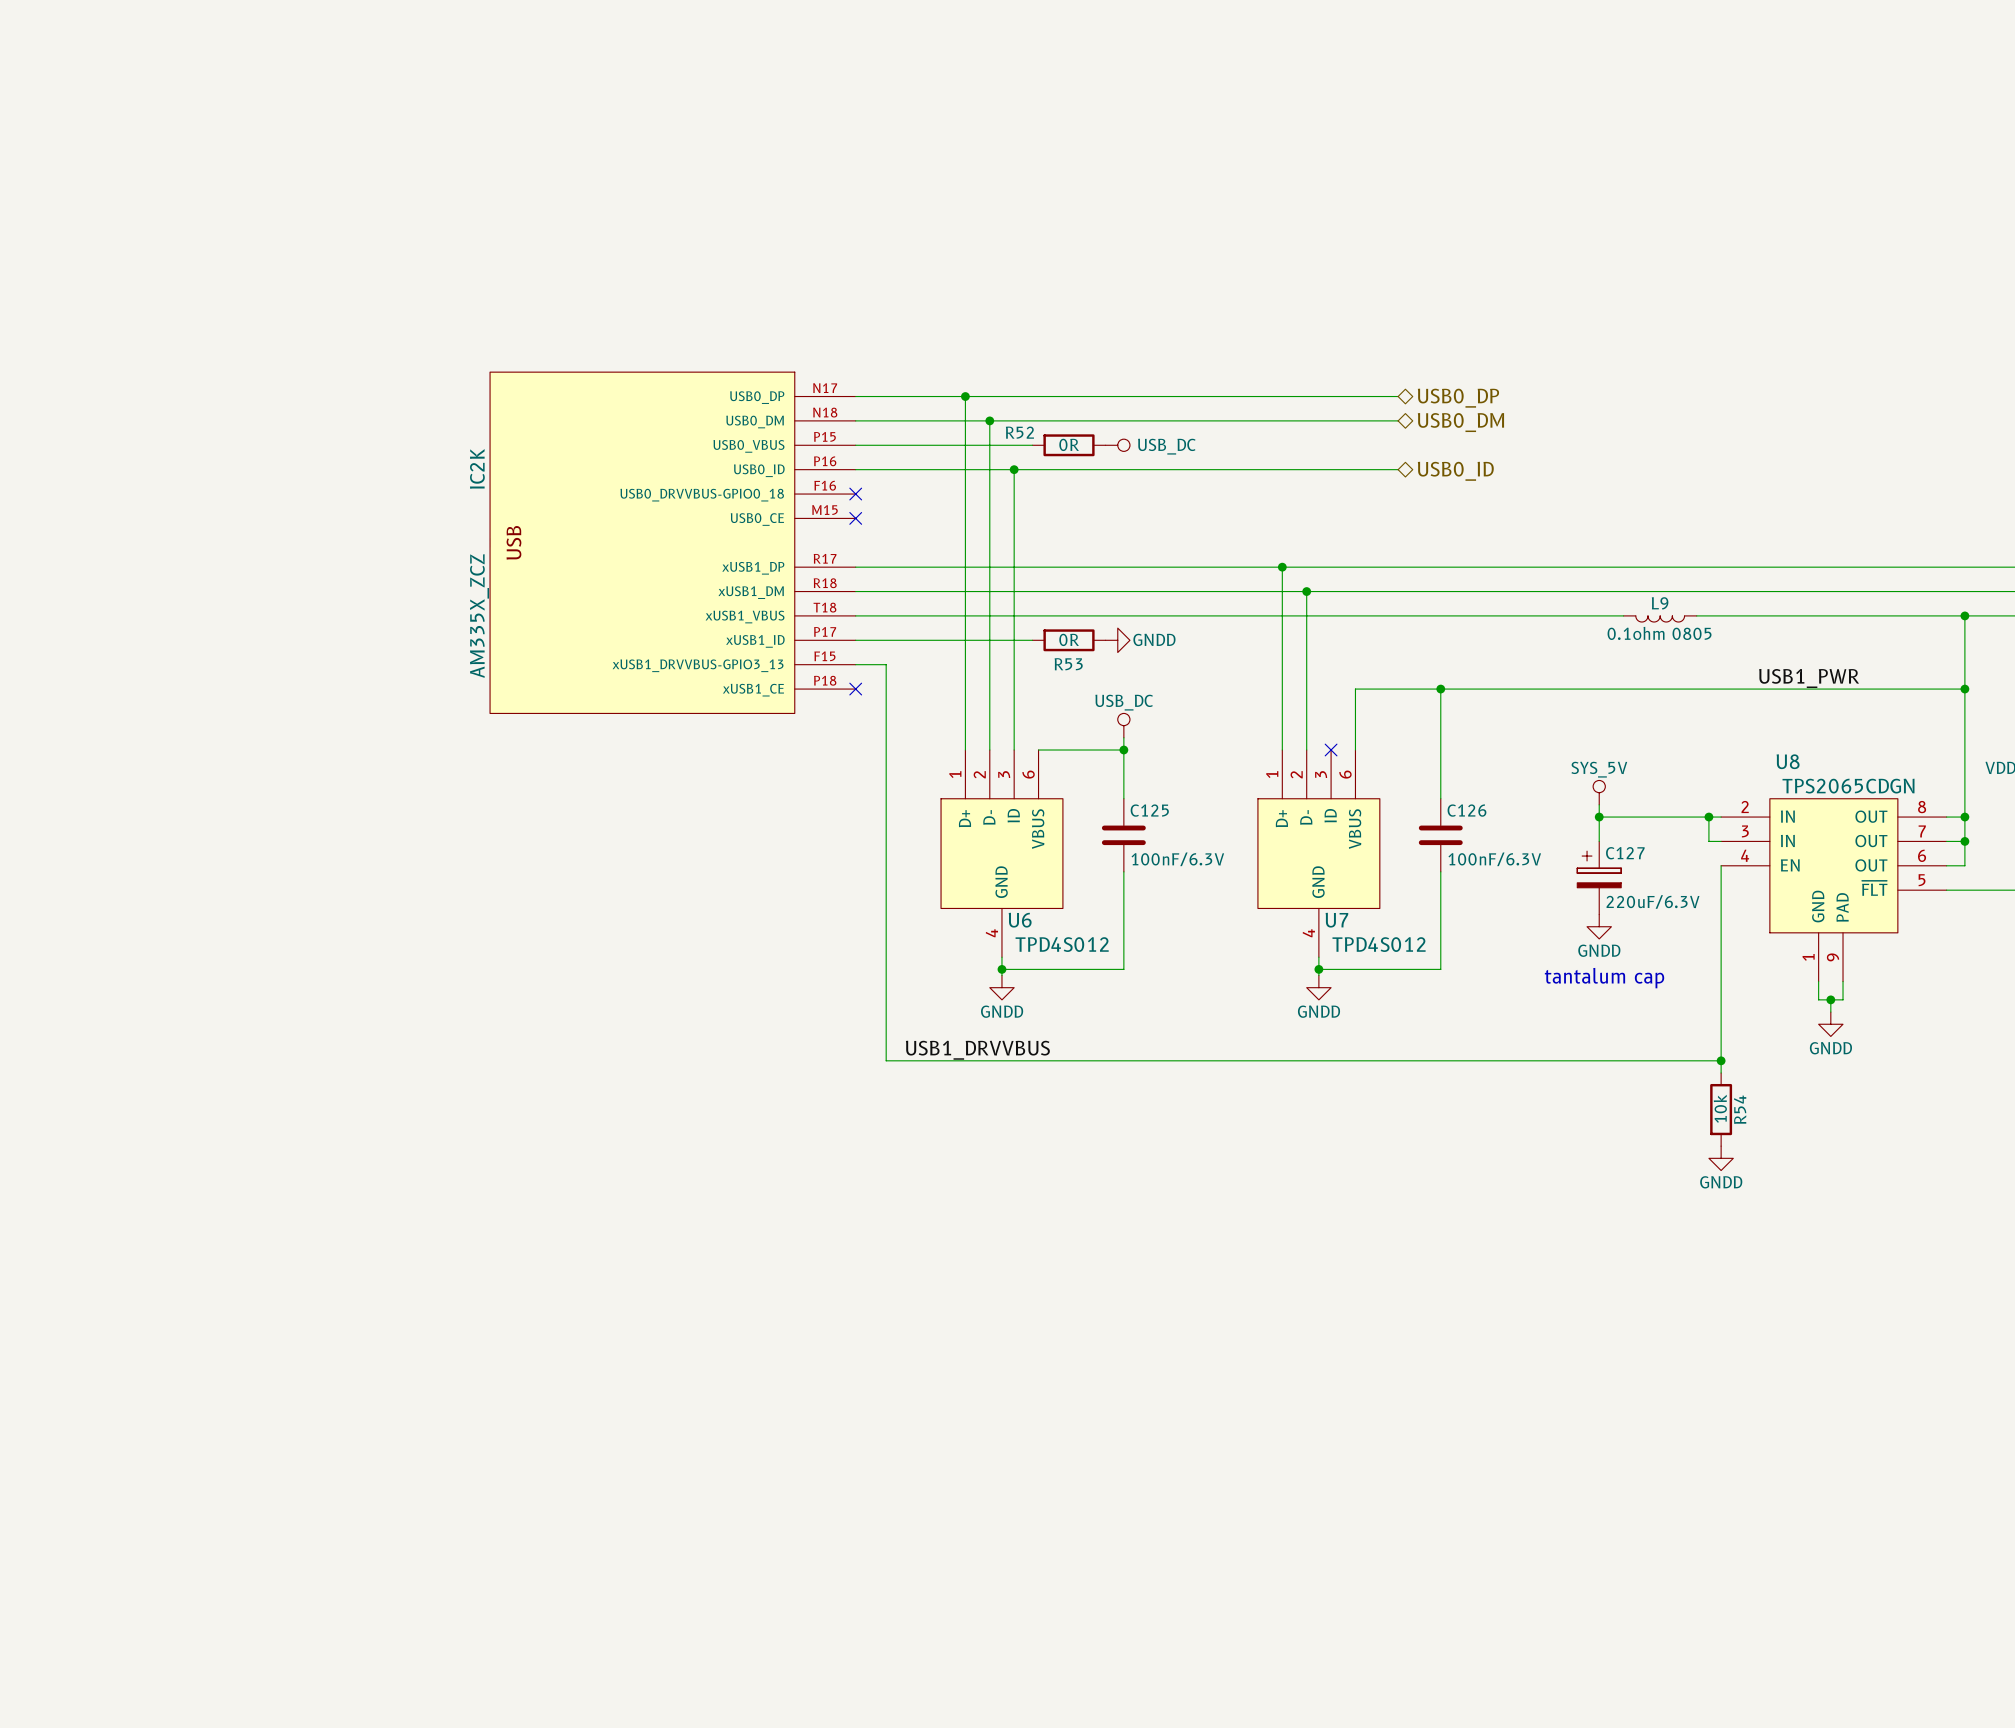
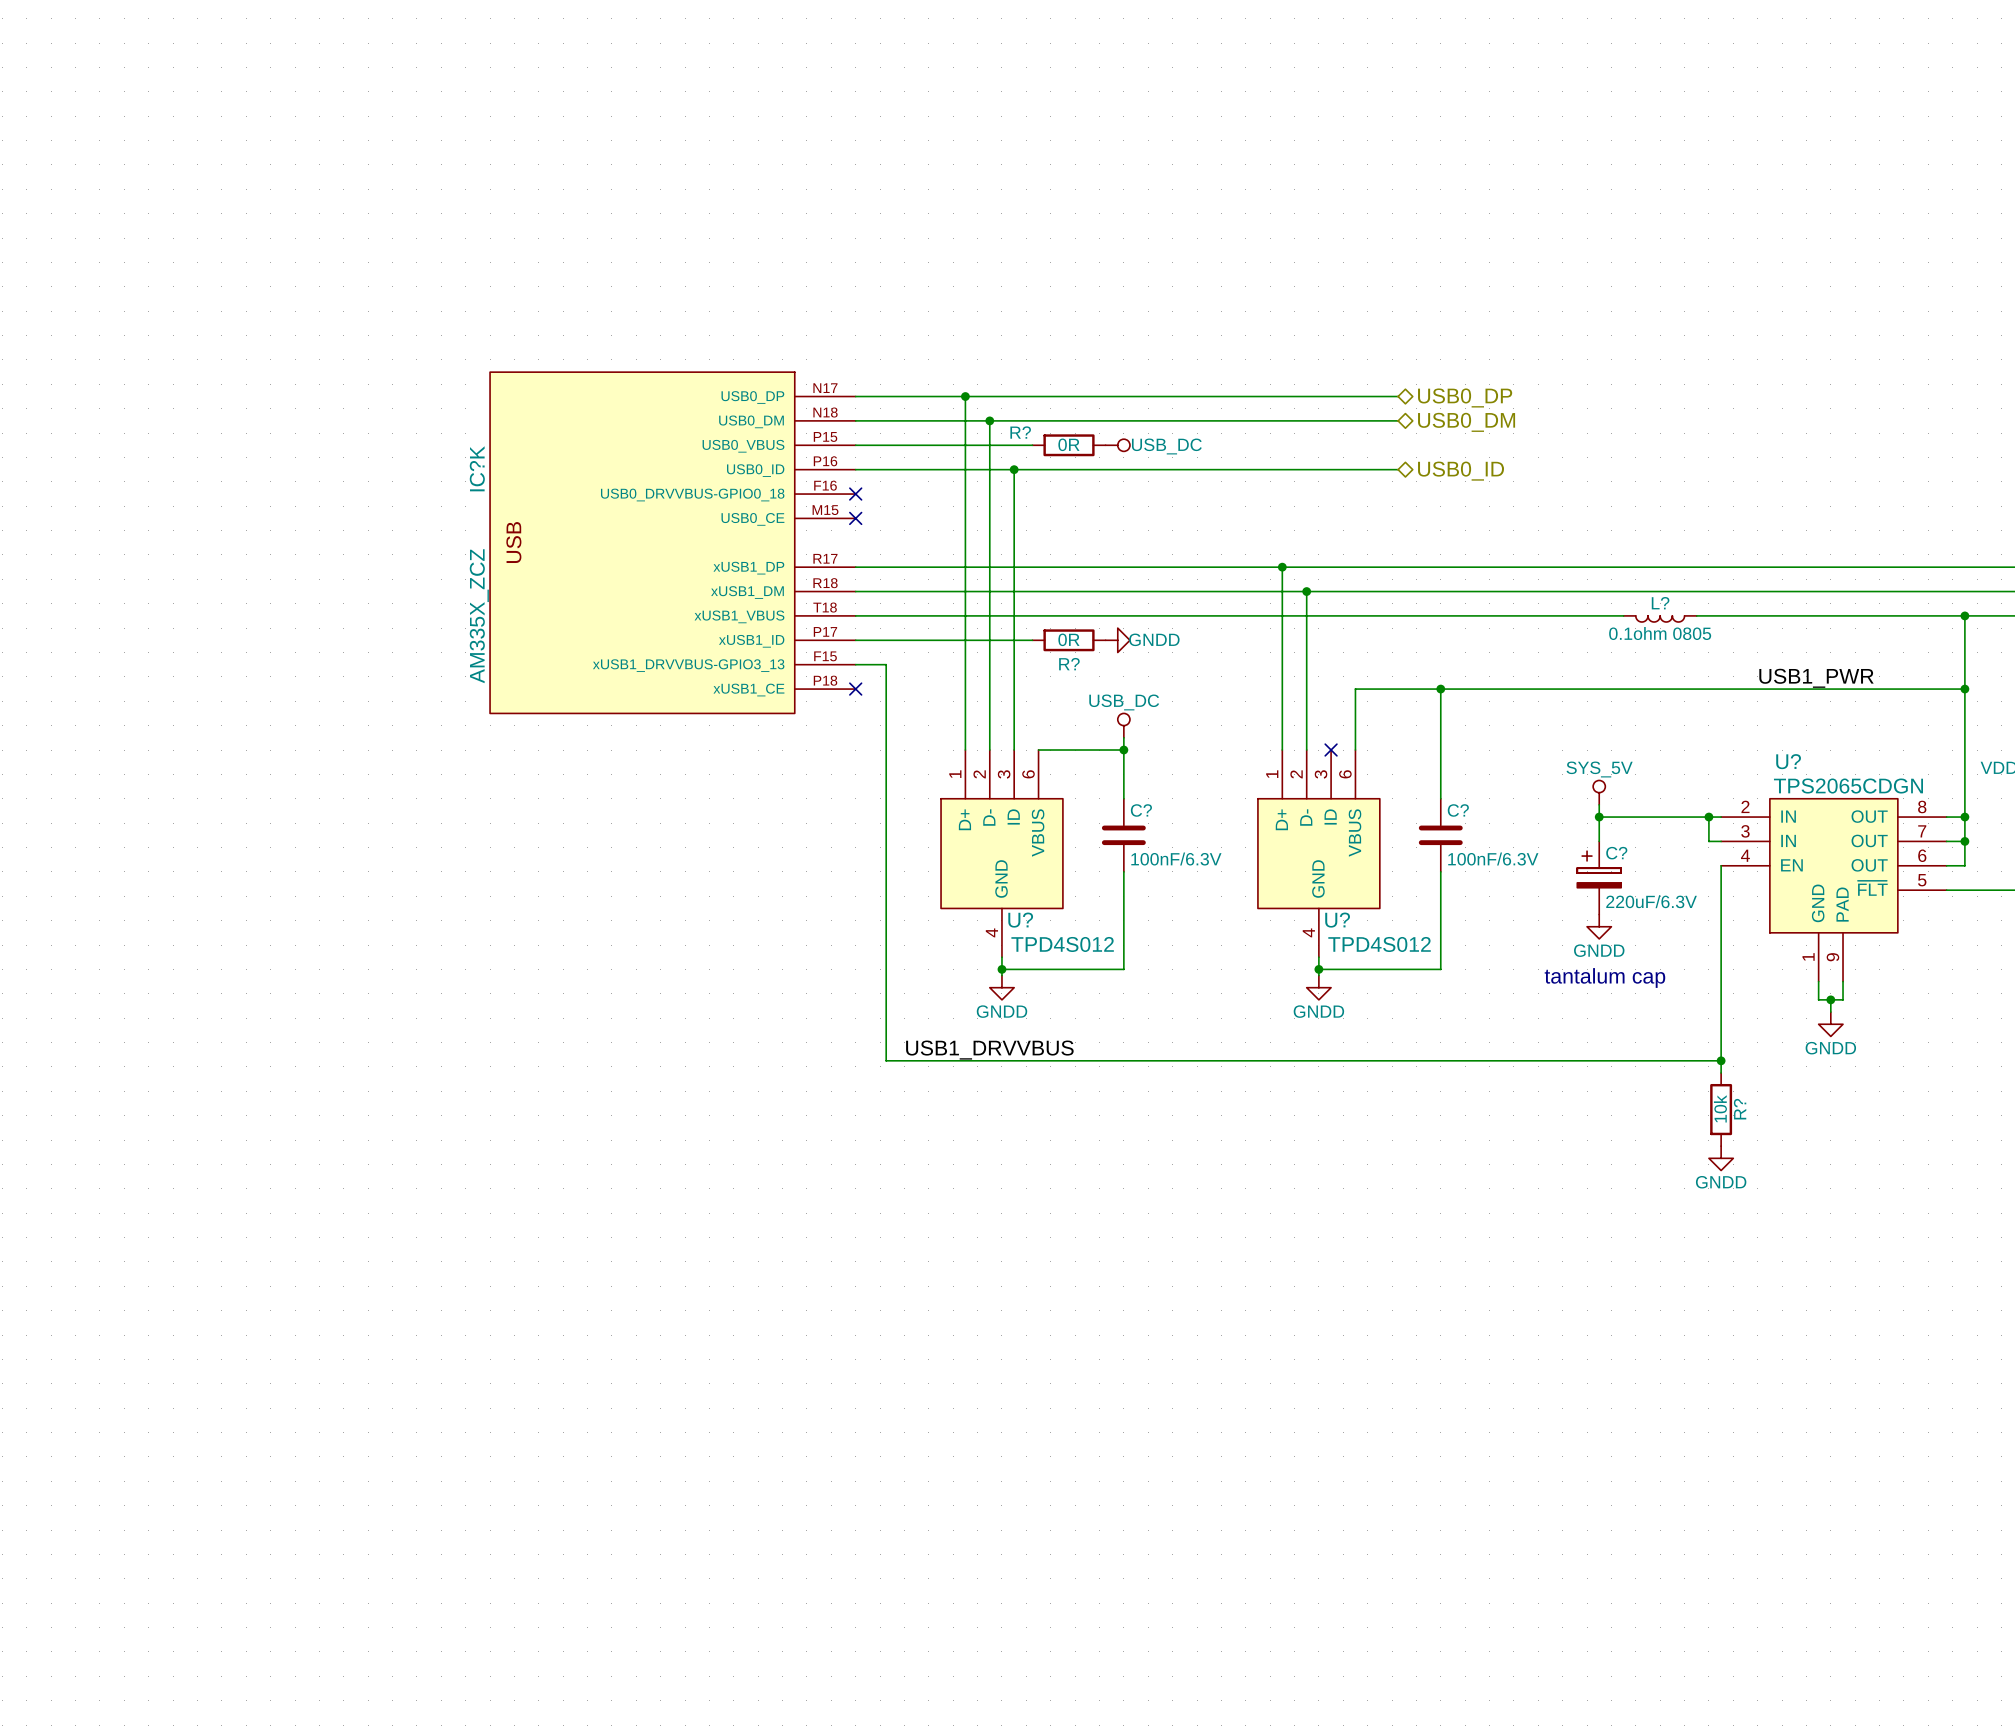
R52 name: R52 (1019, 432) -> R? (1020, 432)
IC2K name: IC2K (477, 468) -> IC?K (477, 468)
L9 name: L9 (1660, 603) -> L? (1660, 603)
R53 name: R53 (1068, 664) -> R? (1069, 664)
U8 name: U8 (1788, 761) -> U? (1788, 761)
C125 name: C125 (1149, 810) -> C? (1141, 810)
C126 name: C126 (1466, 810) -> C? (1458, 810)
C127 name: C127 (1625, 853) -> C? (1616, 853)
U6 name: U6 (1020, 920) -> U? (1020, 920)
U7 name: U7 (1336, 920) -> U? (1337, 920)
R54 name: R54 (1740, 1109) -> R? (1740, 1109)

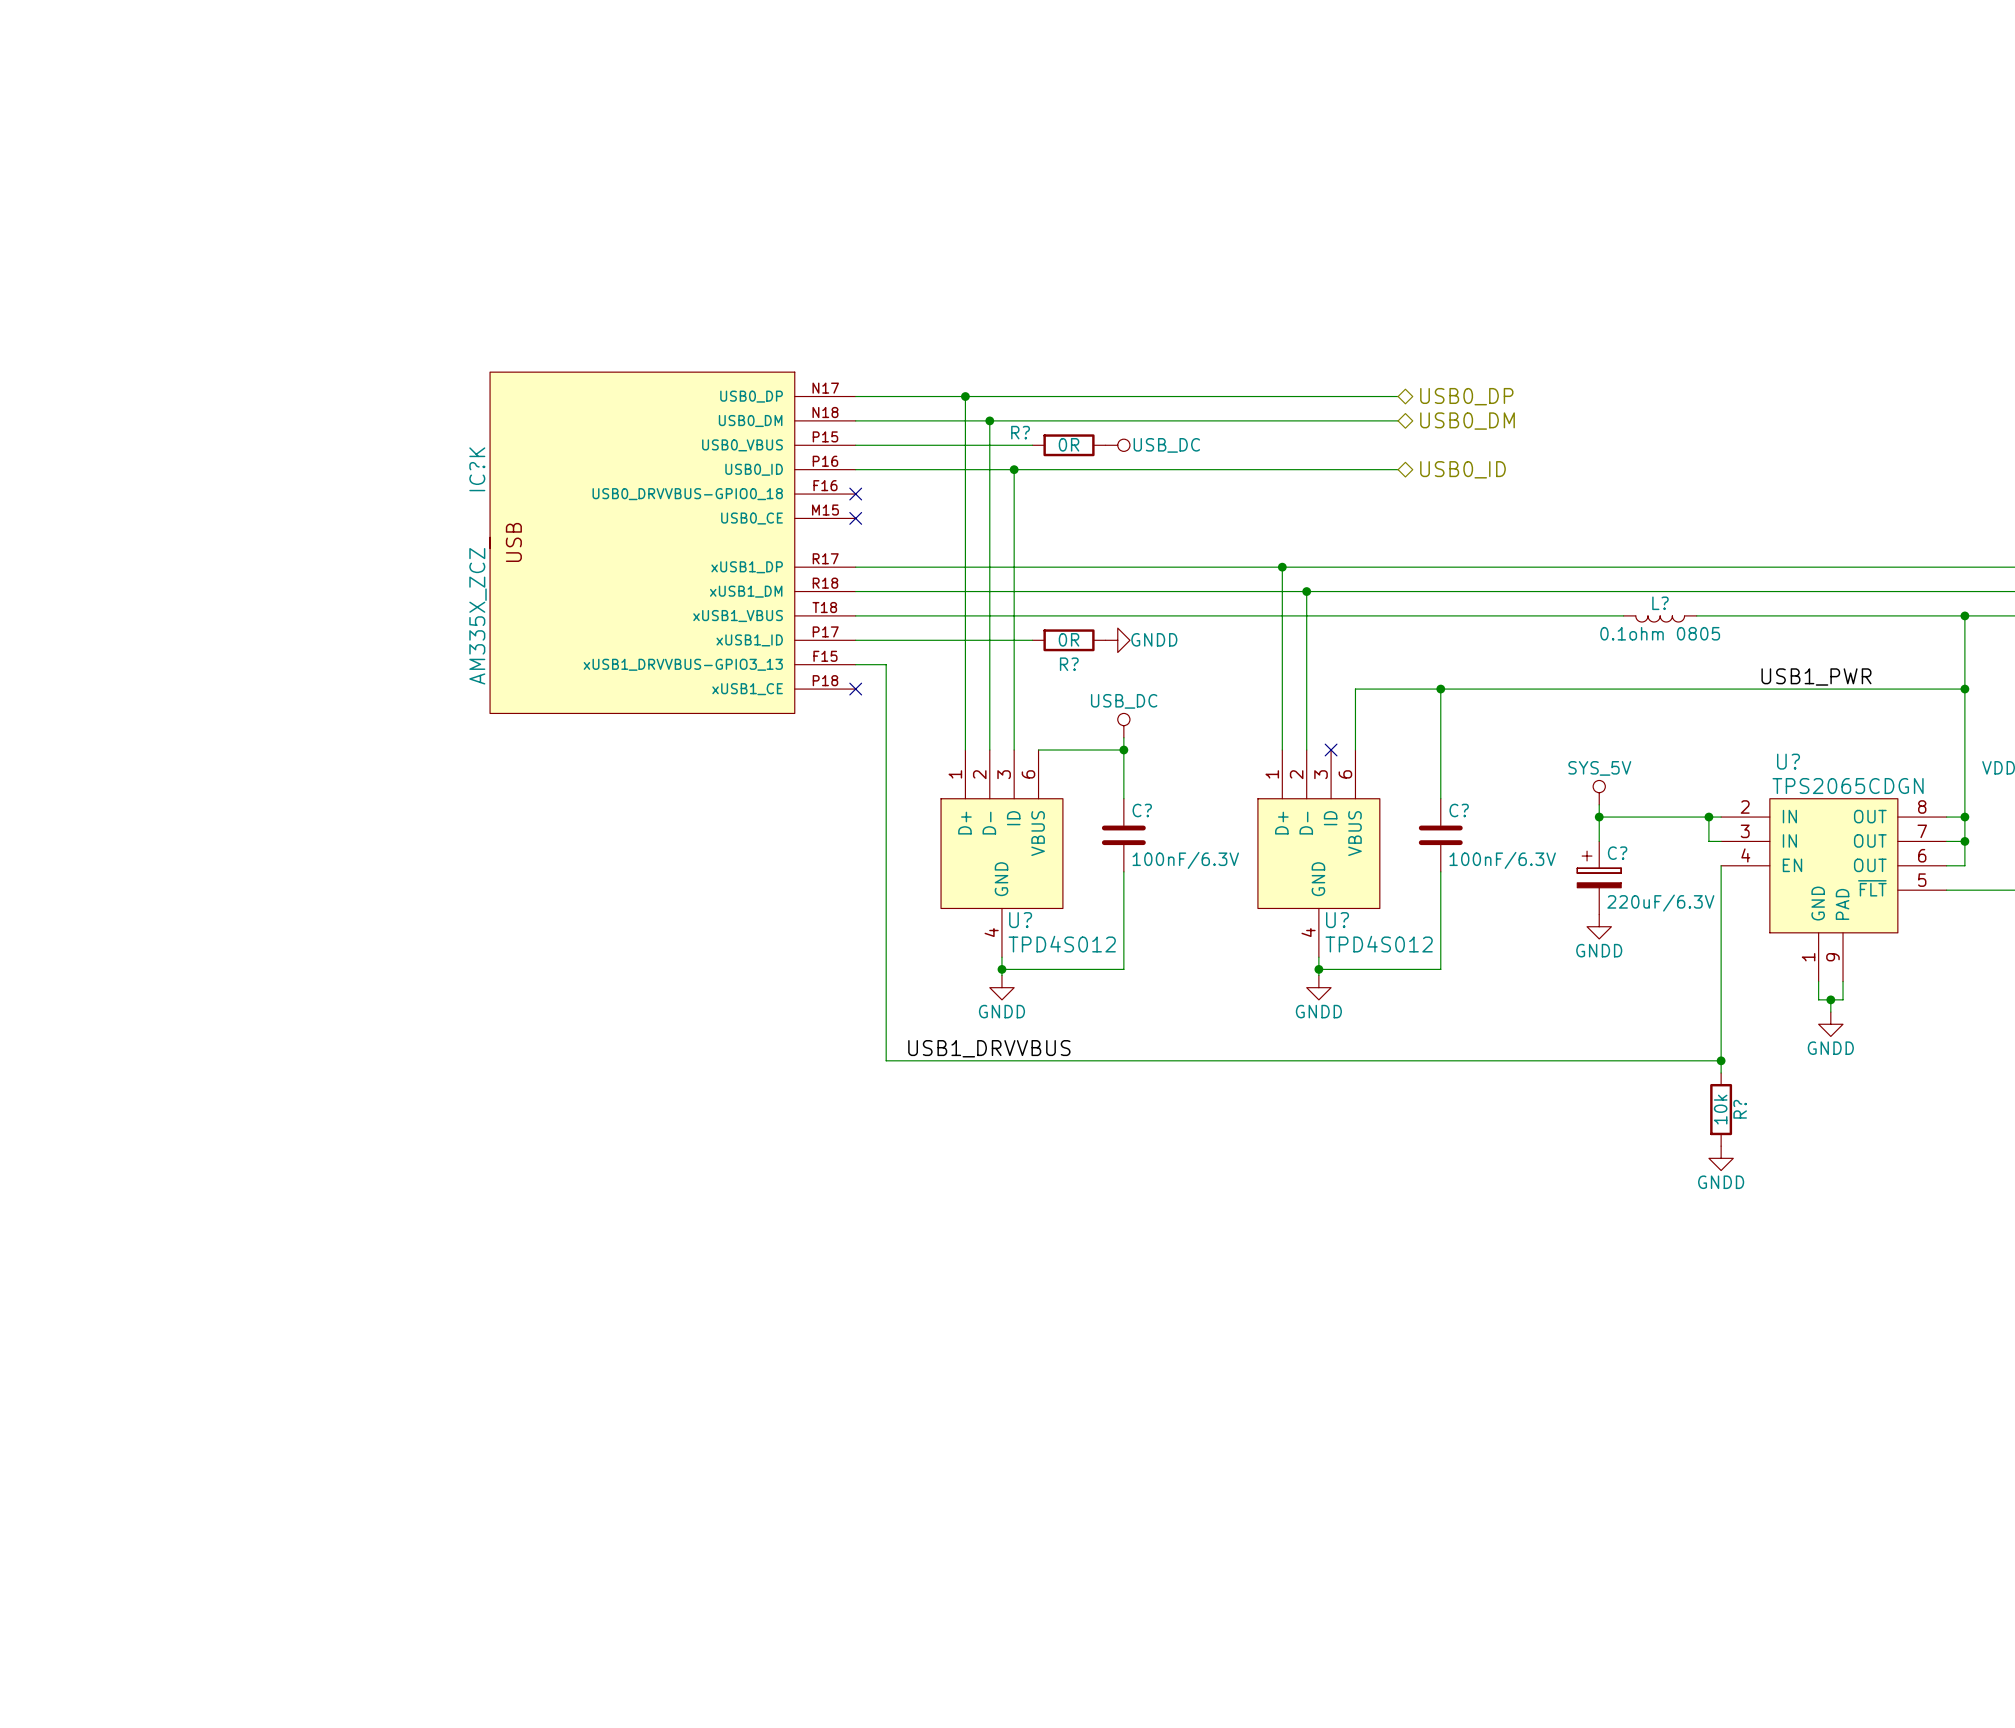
text: tantalum cap (1604, 978) -> none

